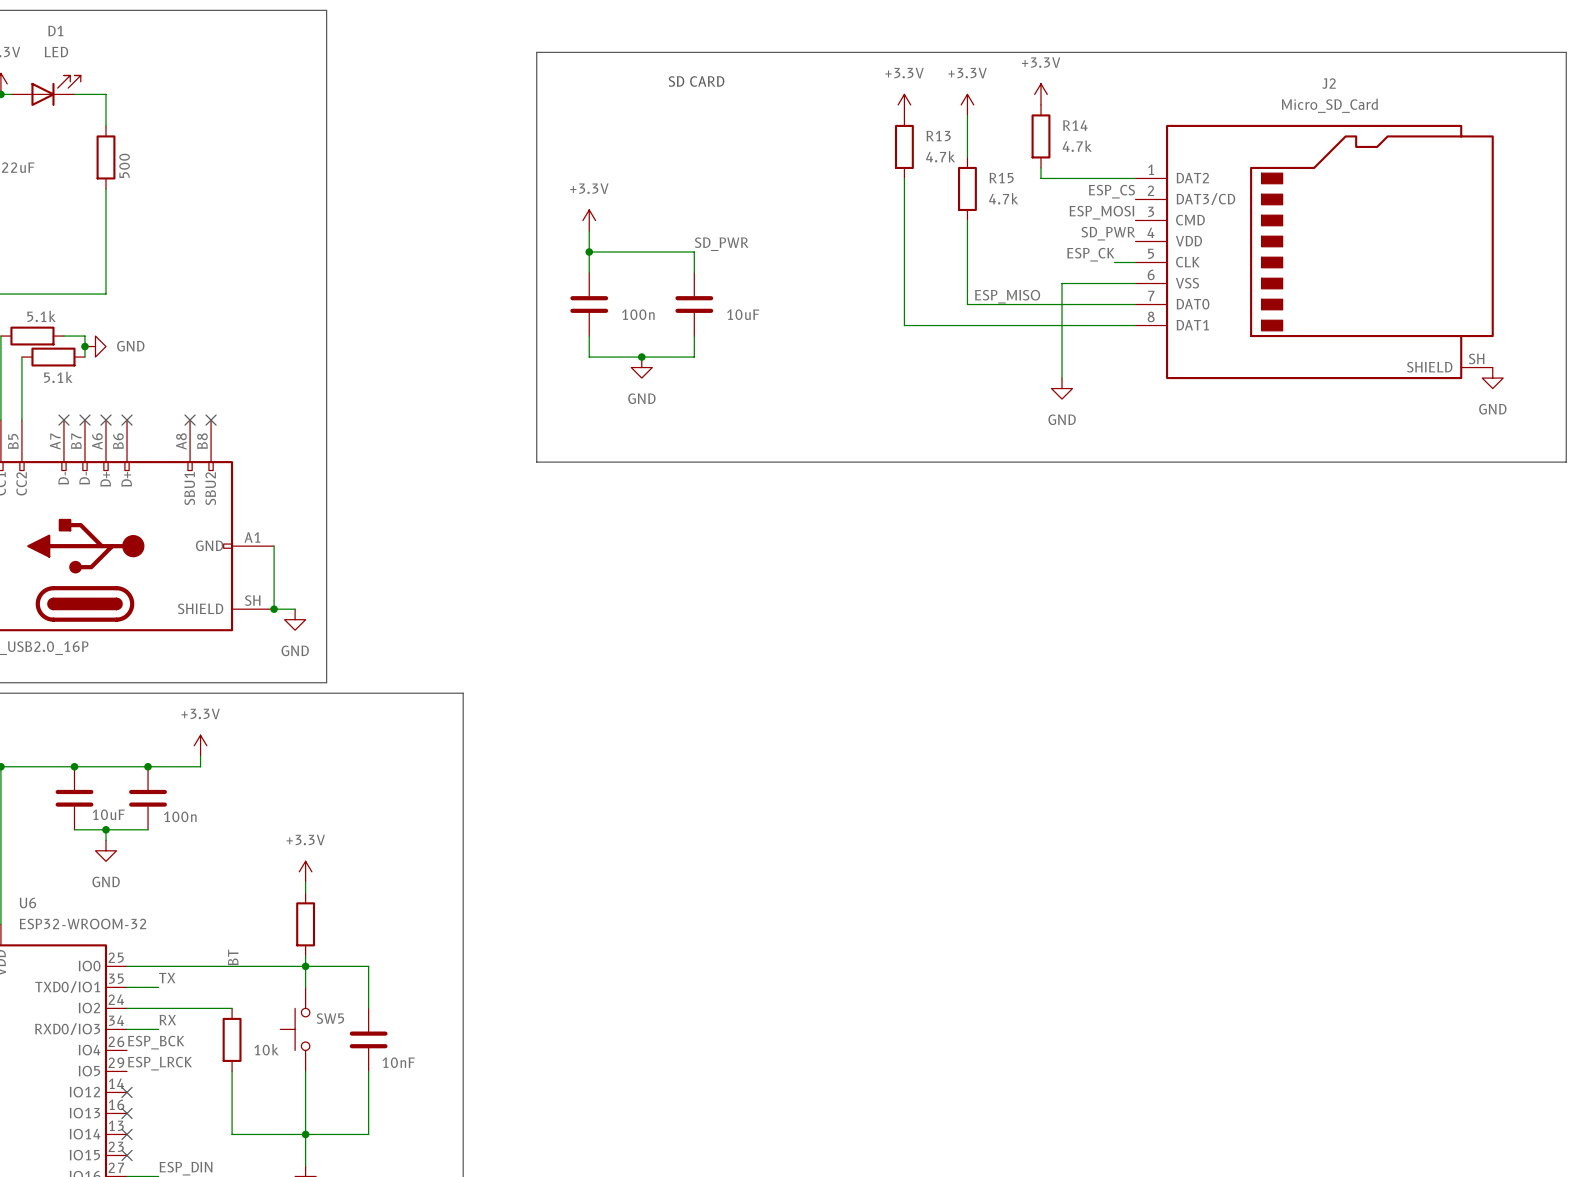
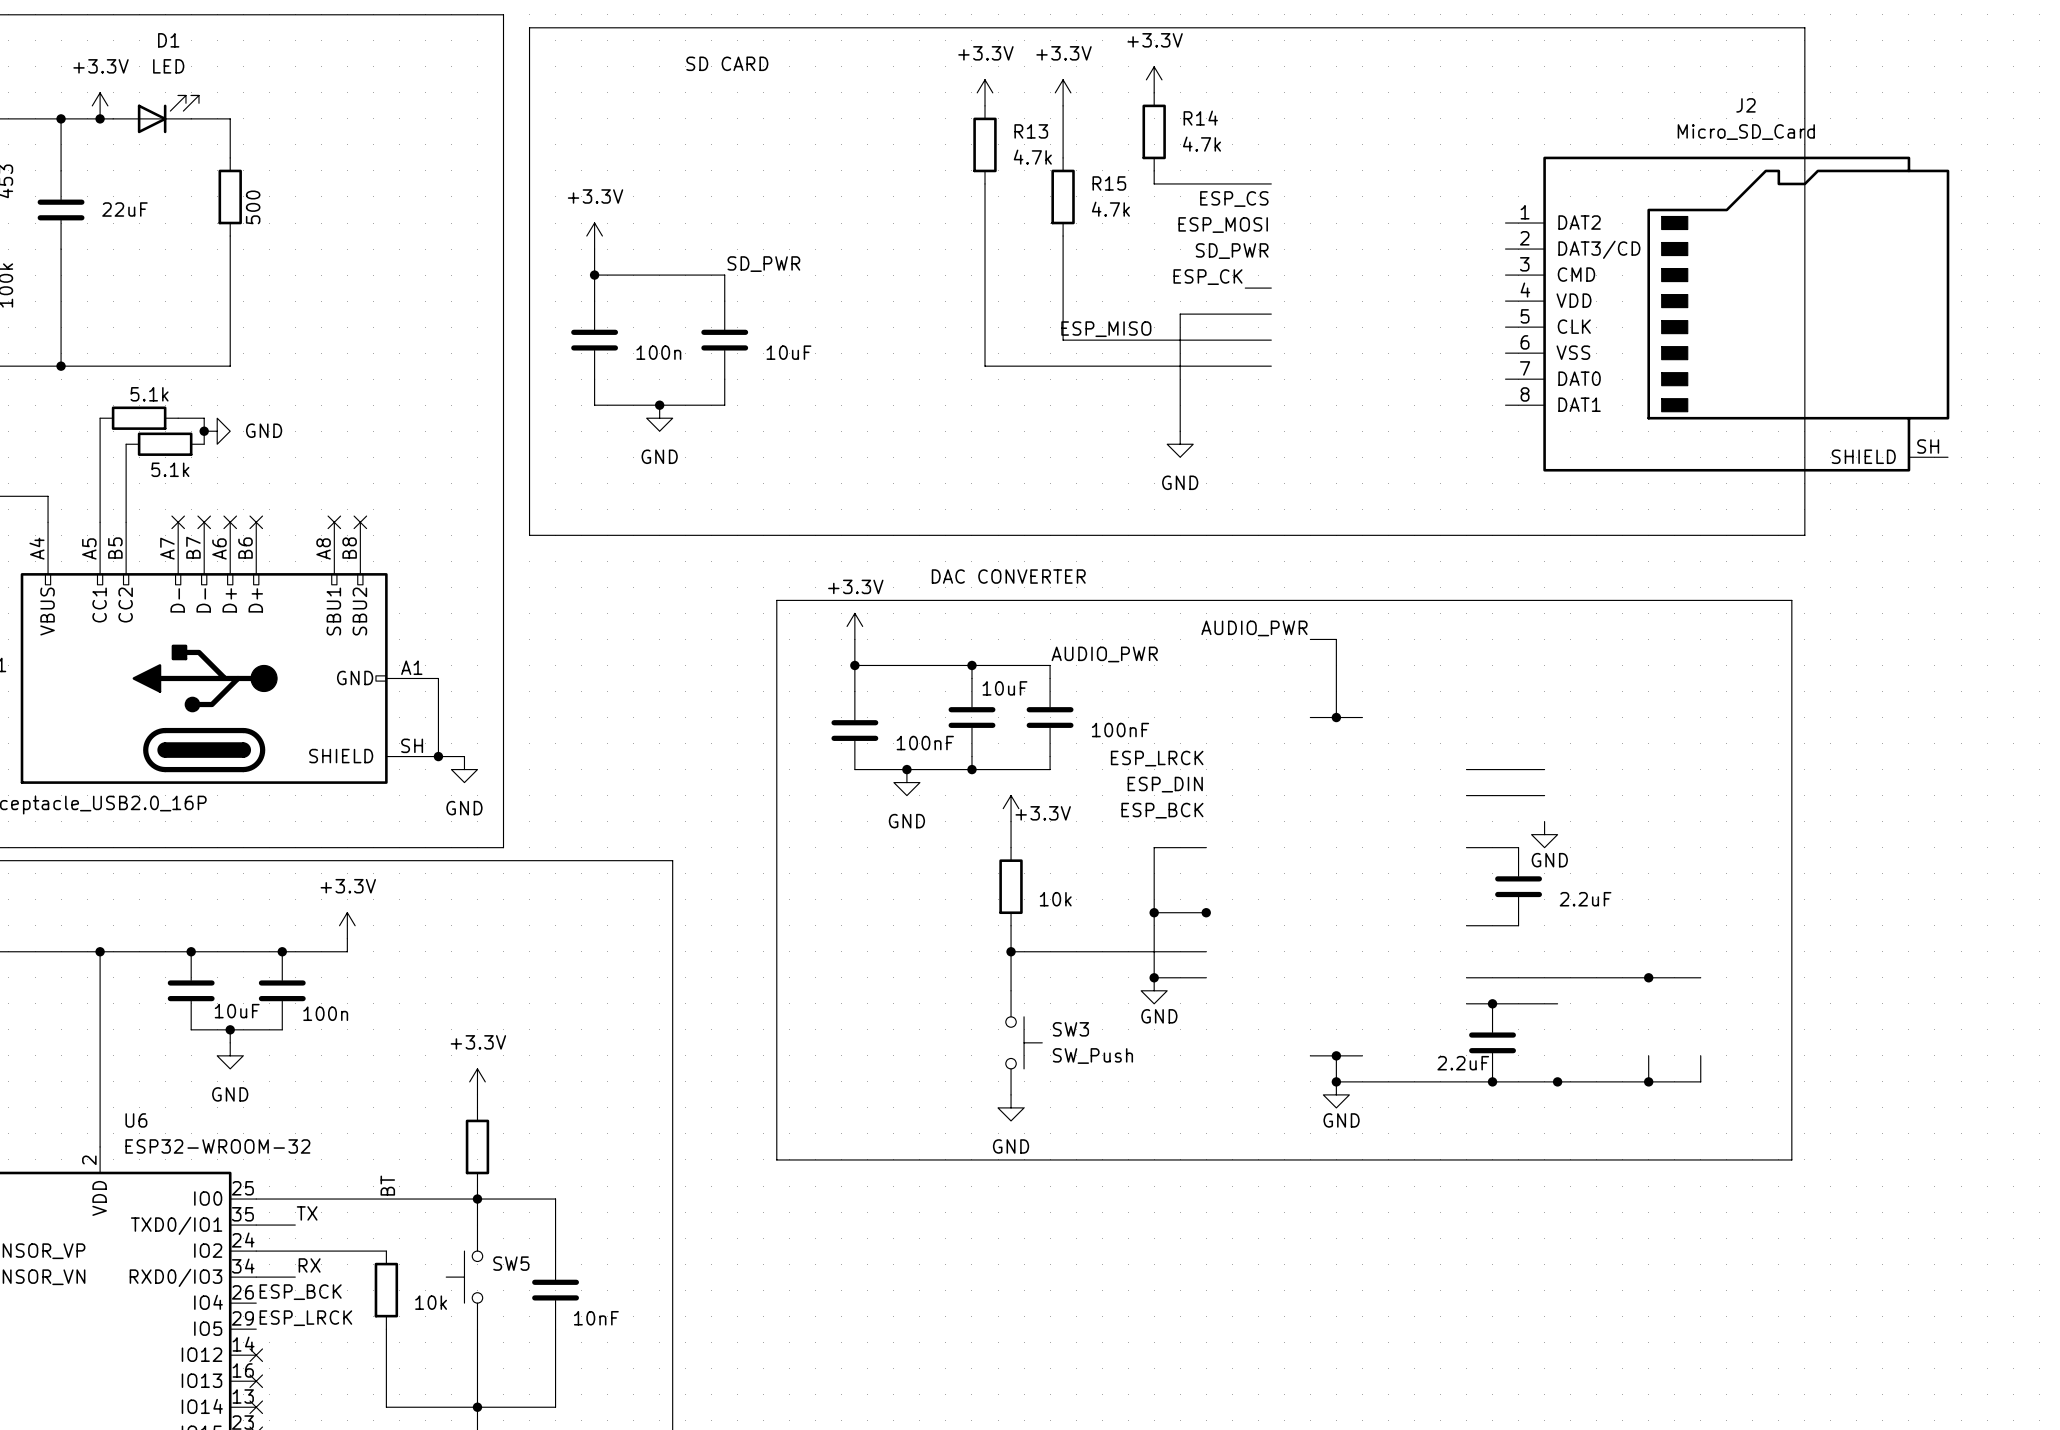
line: (536, 52) (1566, 52) (1566, 462) (536, 462) (536, 52) -> (529, 27) (1804, 27) (1804, 535) (529, 535) (529, 27)
power symbol: none -> +3.3V (1154, 79)
power symbol: none -> +3.3V (985, 92)
power symbol: none -> +3.3V (1063, 92)
text position: SD CARD (696, 81) -> SD CARD (727, 63)
power symbol: +3.3V (1040, 94) -> none
power symbol: +3.3V (904, 104) -> none
power symbol: +3.3V (967, 104) -> none
wire: (967, 115) (967, 157) -> (1063, 105) (1063, 157)
R14 position: (1040, 136) -> (1154, 131)
R13 position: (904, 146) -> (985, 144)
wire: (1040, 167) (1040, 178) (1135, 178) -> (1154, 170) (1154, 183) (1271, 183)
wire: (904, 178) (904, 325) (1135, 325) -> (985, 183) (985, 366) (1271, 366)
power symbol: none -> +3.3V (594, 236)
R15 position: (967, 188) -> (1063, 196)
label position: ESP_CS (1111, 191) -> ESP_CS (1234, 199)
label: none -> SD_PWR (1232, 251)
label: none -> SD_PWR (763, 264)
label position: ESP_MOSI (1101, 212) -> ESP_MOSI (1223, 225)
junction: none -> (594, 275)
power symbol: +3.3V (589, 220) -> none
wire: (967, 220) (967, 304) (1135, 304) -> (1063, 236) (1063, 340) (1271, 340)
wire: (589, 230) (589, 273) -> (594, 249) (594, 301)
label: SD_PWR (1108, 233) -> none
label: SD_PWR (721, 244) -> none
wire: (589, 251) (694, 251) (694, 273) -> (594, 275) (724, 275) (724, 301)
junction: (589, 251) -> none
label position: ESP_CK (1090, 254) -> ESP_CK (1207, 277)
wire: (1114, 262) (1135, 262) -> (1245, 288) (1271, 288)
part: none -> 10uF (724, 340)
wire: (1135, 283) (1062, 283) (1062, 378) -> (1271, 314) (1180, 314) (1180, 431)
label position: ESP_MISO (1007, 296) -> ESP_MISO (1106, 329)
part position: (589, 304) -> (594, 340)
part: 10uF (694, 304) -> none
junction: none -> (659, 405)
power symbol: none -> GND (659, 418)
wire: (589, 336) (589, 357) (694, 357) (694, 336) -> (594, 379) (594, 405) (724, 405) (724, 379)
junction: (641, 357) -> none
power symbol: none -> GND (1180, 444)
power symbol: GND (641, 367) -> none
power symbol: GND (1492, 378) -> none
power symbol: GND (1062, 388) -> none
text: none -> DAC CONVERTER (1008, 576)
line: none -> (776, 600) (1791, 600) (1791, 1159) (776, 1159) (776, 600)
power symbol: none -> +3.3V (854, 626)
label: none -> AUDIO_PWR (1254, 628)
wire: none -> (854, 639) (854, 691)
wire: none -> (1310, 639) (1336, 639) (1336, 717)
label: none -> AUDIO_PWR (1104, 654)
wire: none -> (854, 665) (1050, 665) (1050, 678)
junction: none -> (854, 665)
wire: none -> (971, 665) (971, 678)
junction: none -> (971, 665)
part: none -> 10uF (971, 717)
part: none -> 100nF (1050, 717)
wire: none -> (1310, 717) (1362, 717)
junction: none -> (1336, 717)
part: none -> 100nF (854, 730)
wire: none -> (971, 756) (971, 769)
wire: none -> (1050, 756) (1050, 769) (854, 769)
label: none -> ESP_LRCK (1157, 758)
junction: none -> (906, 769)
junction: none -> (971, 769)
wire: none -> (1466, 769) (1544, 769)
power symbol: none -> GND (906, 782)
label: none -> ESP_DIN (1165, 784)
wire: none -> (1466, 795) (1544, 795)
power symbol: none -> +3.3V (1011, 808)
label: none -> ESP_BCK (1162, 810)
wire: none -> (1011, 821) (1011, 847)
power symbol: none -> GND (1544, 834)
wire: none -> (1206, 847) (1154, 847) (1154, 977) (1206, 977)
wire: none -> (1466, 847) (1518, 847)
part: none -> 10k (1011, 886)
part: none -> 2.2uF (1518, 886)
wire: none -> (1154, 912) (1206, 912)
junction: none -> (1154, 912)
junction: none -> (1206, 912)
wire: none -> (1011, 925) (1011, 990)
wire: none -> (1466, 925) (1518, 925)
wire: none -> (1011, 951) (1206, 951)
junction: none -> (1011, 951)
junction: none -> (1154, 977)
wire: none -> (1466, 977) (1700, 977)
junction: none -> (1648, 977)
power symbol: none -> GND (1154, 990)
wire: none -> (1466, 1003) (1557, 1003)
junction: none -> (1492, 1003)
SW3: none -> SW_Push (1024, 1042)
part: none -> 2.2uF (1492, 1042)
wire: none -> (1310, 1055) (1362, 1055)
wire: none -> (1336, 1055) (1336, 1081) (1700, 1081) (1700, 1055)
junction: none -> (1336, 1055)
wire: none -> (1648, 1055) (1648, 1081)
junction: none -> (1336, 1081)
junction: none -> (1492, 1081)
junction: none -> (1557, 1081)
junction: none -> (1648, 1081)
power symbol: none -> GND (1336, 1094)
power symbol: none -> GND (1011, 1107)

